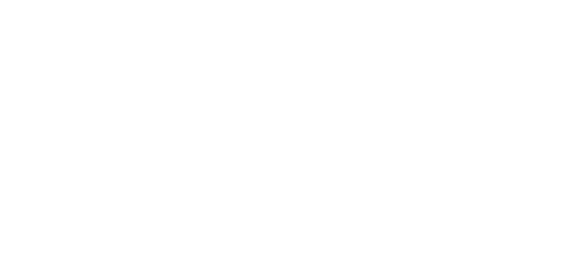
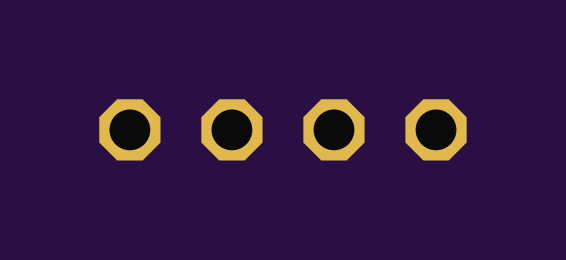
part: none -> (282, 129)

